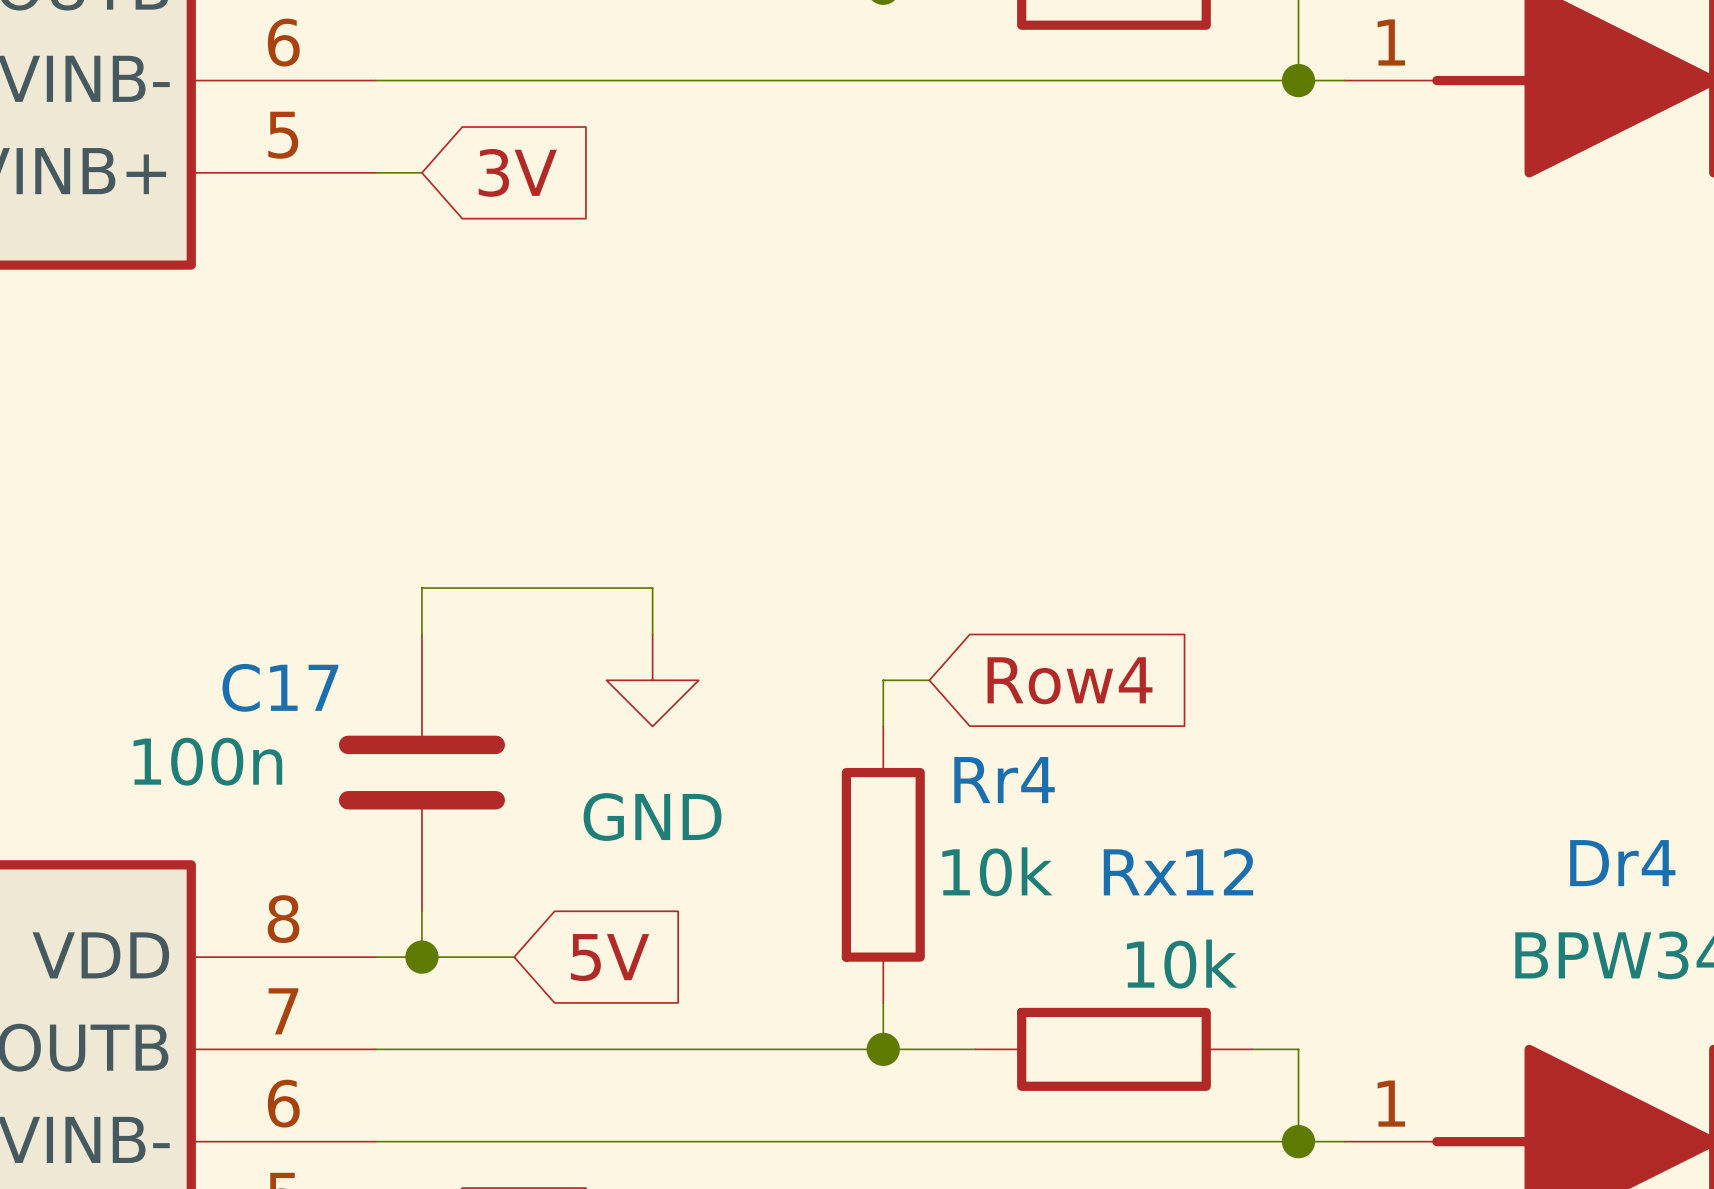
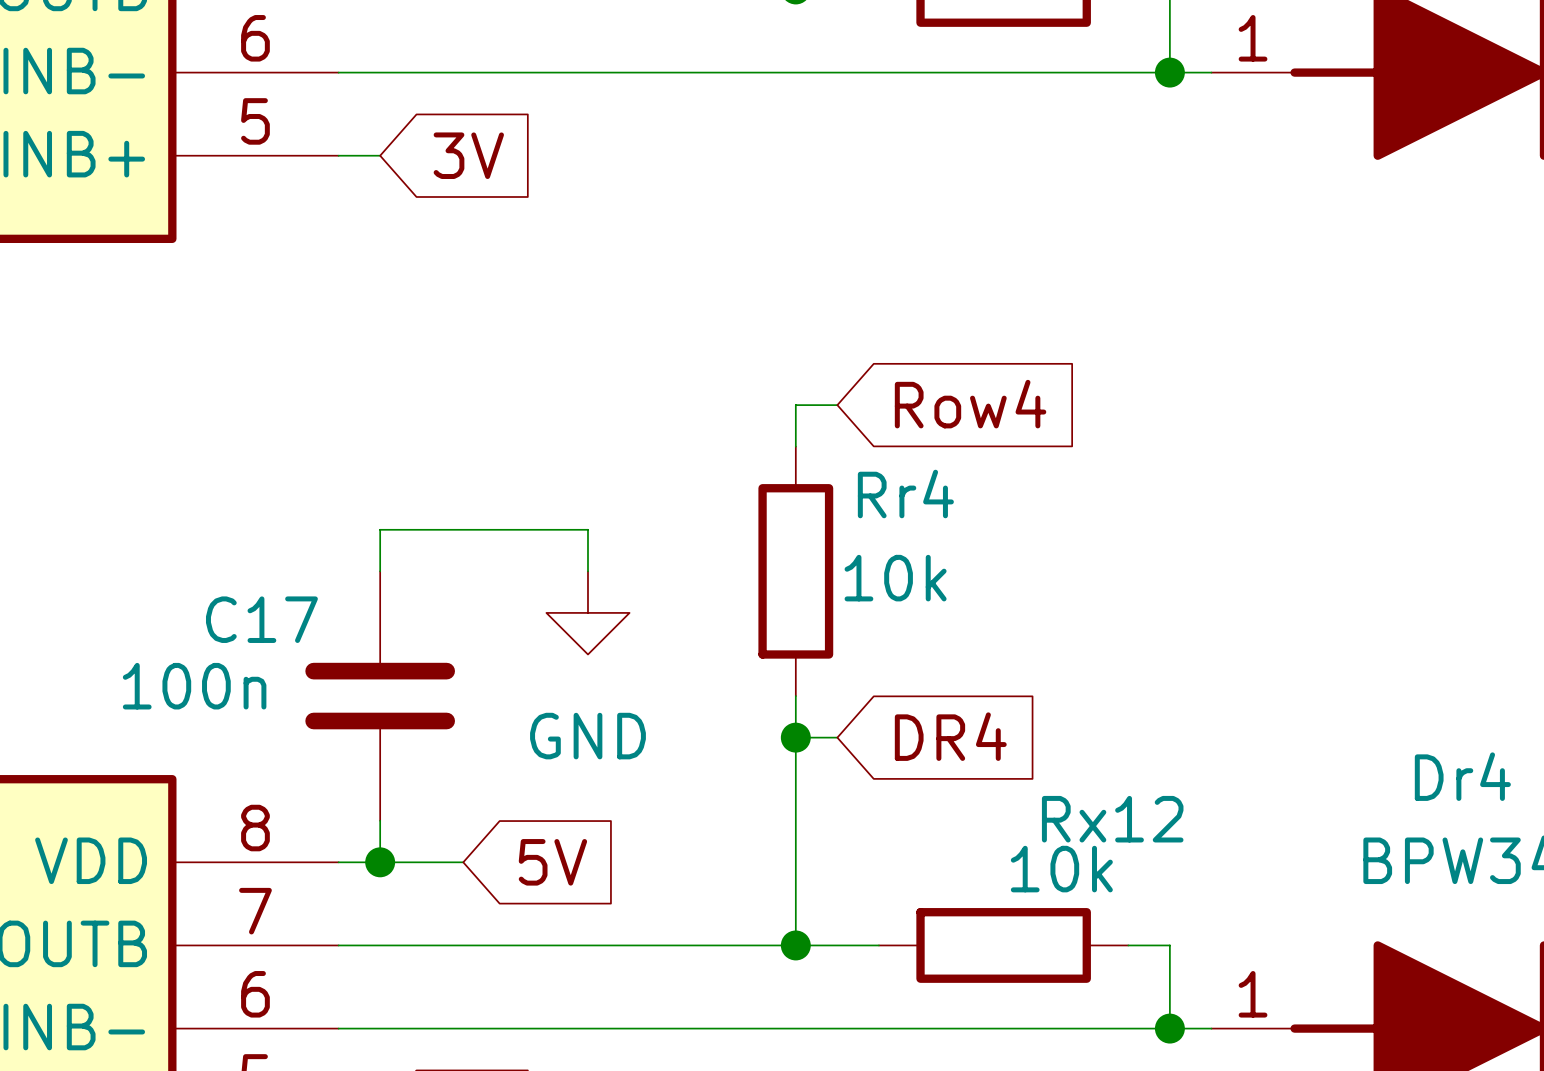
wire: (929, 680) (883, 680) (883, 726) -> (837, 405) (795, 405) (795, 446)
global label position: Row4 (1070, 680) -> Row4 (970, 404)
wire: none -> (795, 696) (795, 903)
wire: none -> (795, 737) (837, 737)
junction: none -> (795, 737)
global label: none -> DR4 (950, 736)
Rr4 position: (883, 864) -> (795, 571)
Rx12 name position: Rx12 (1178, 871) -> Rx12 (1112, 819)

